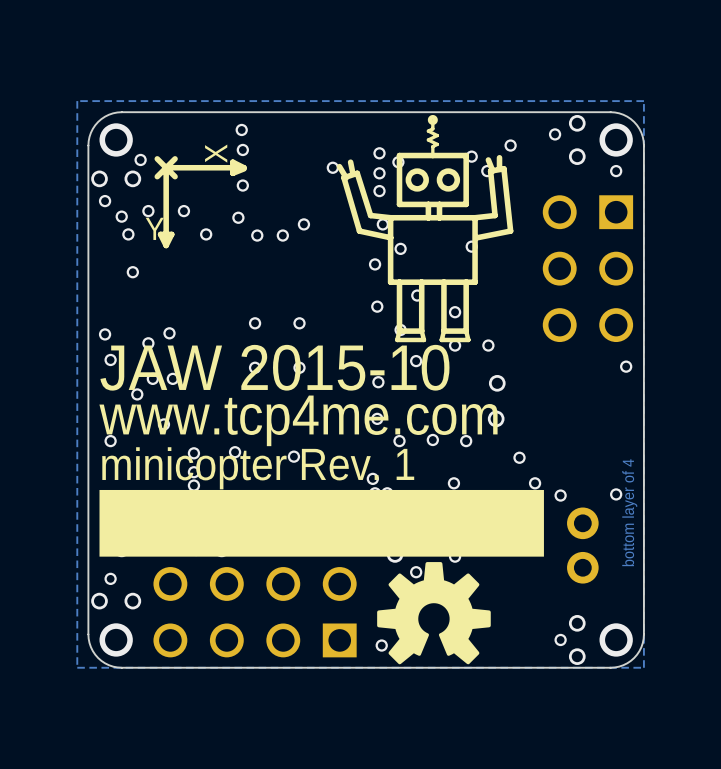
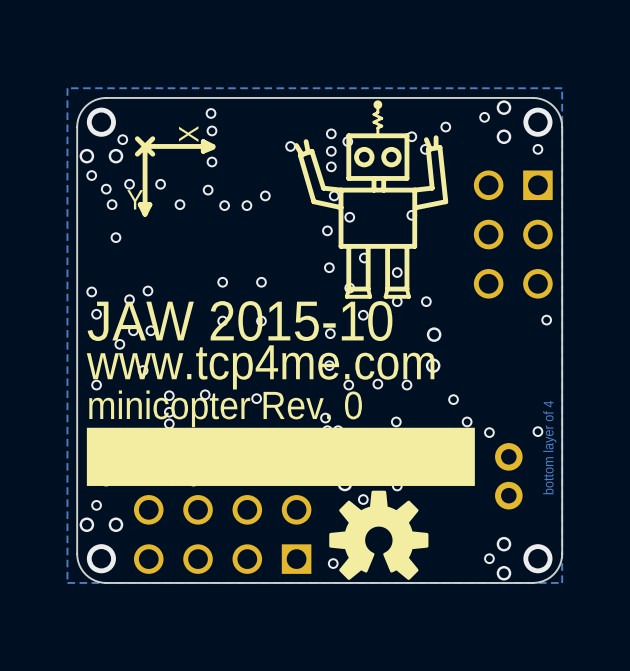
text: minicopter Rev. 1 (258, 468) -> minicopter Rev. 0 (225, 408)

